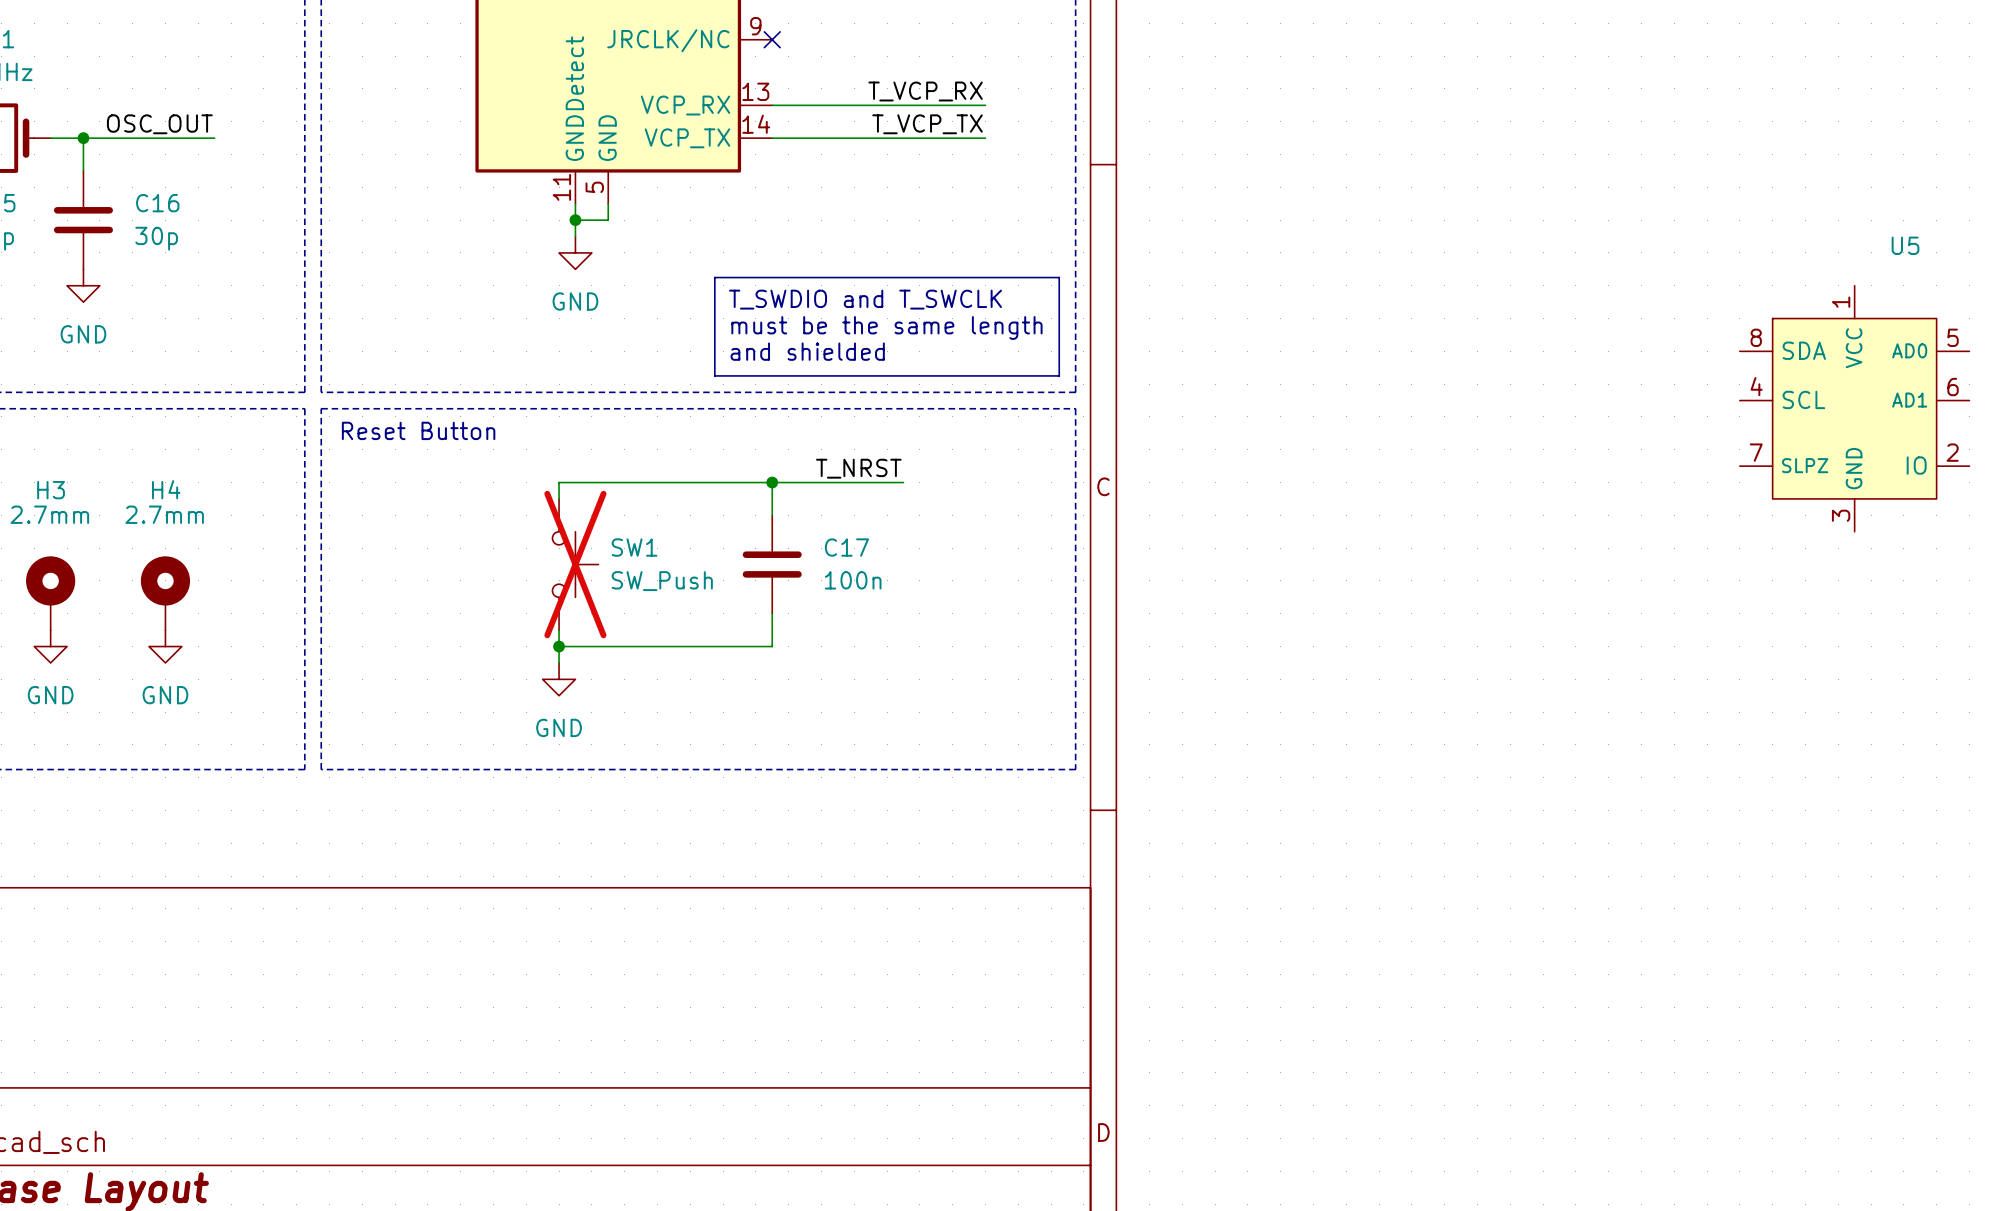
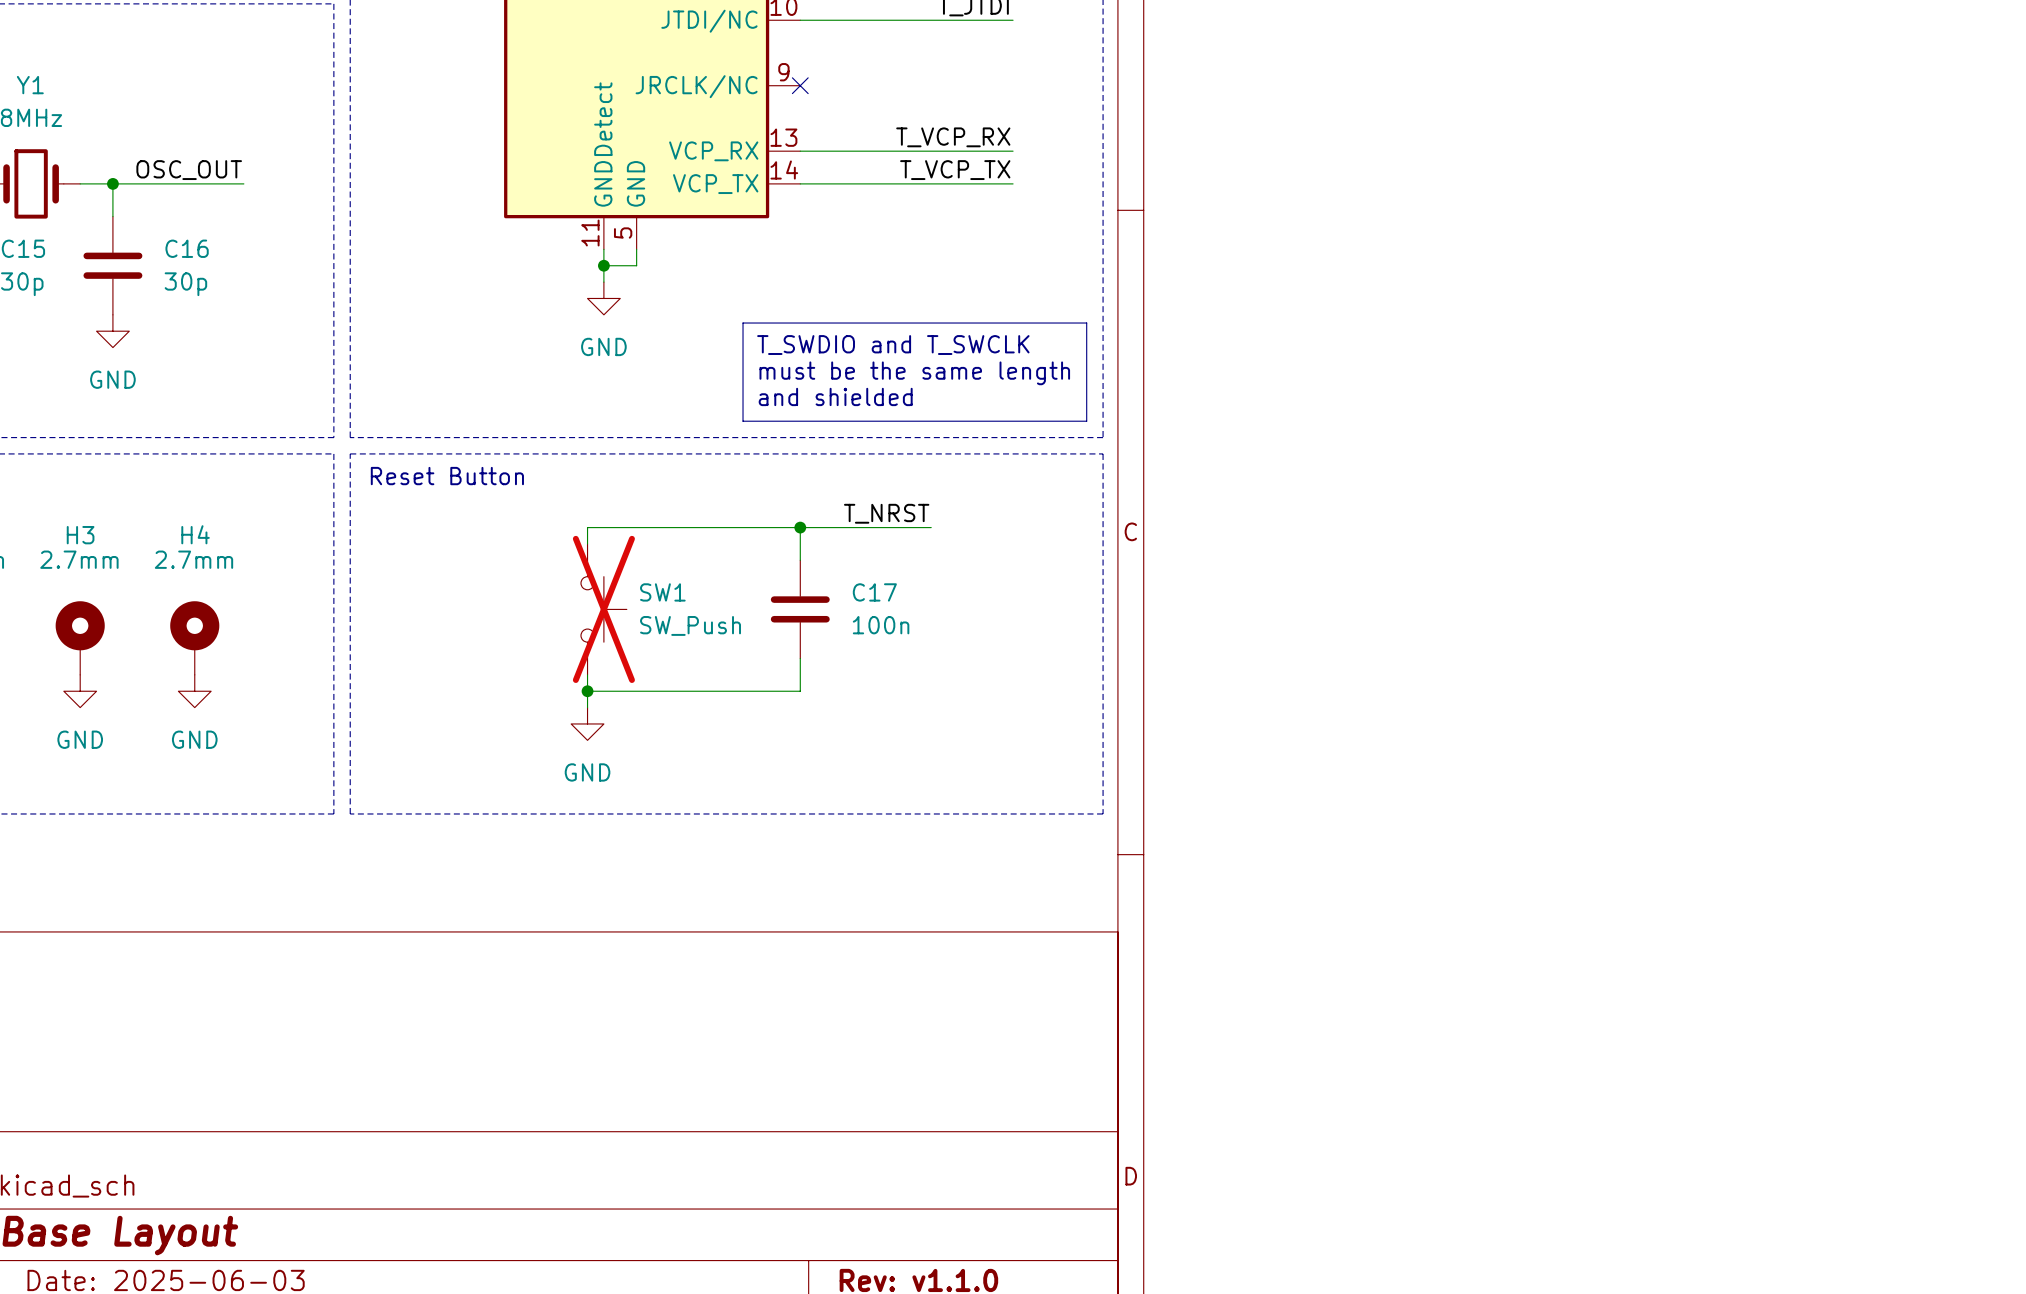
U5: (1854, 408) -> none

